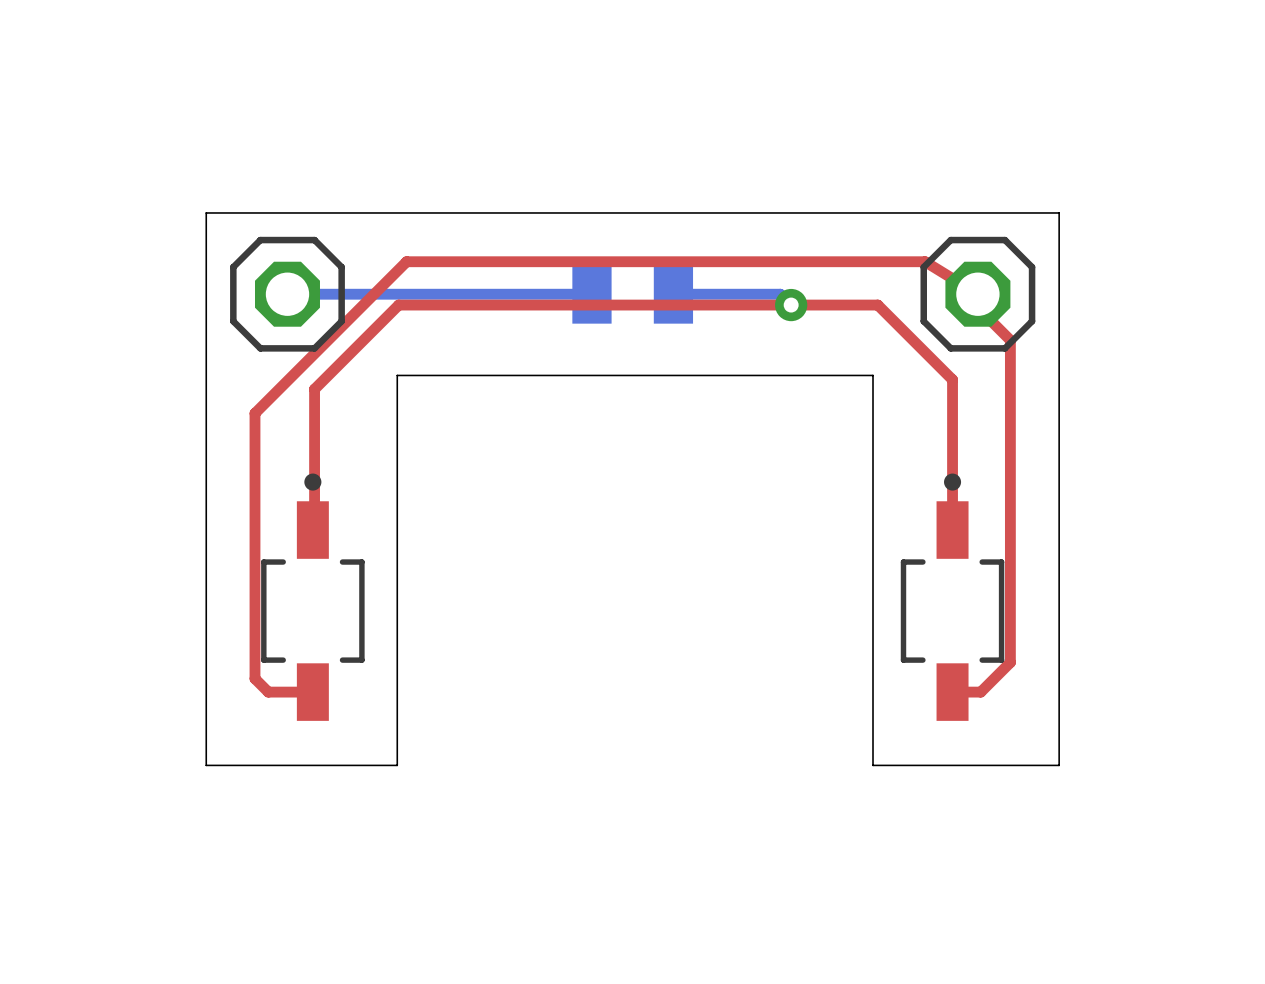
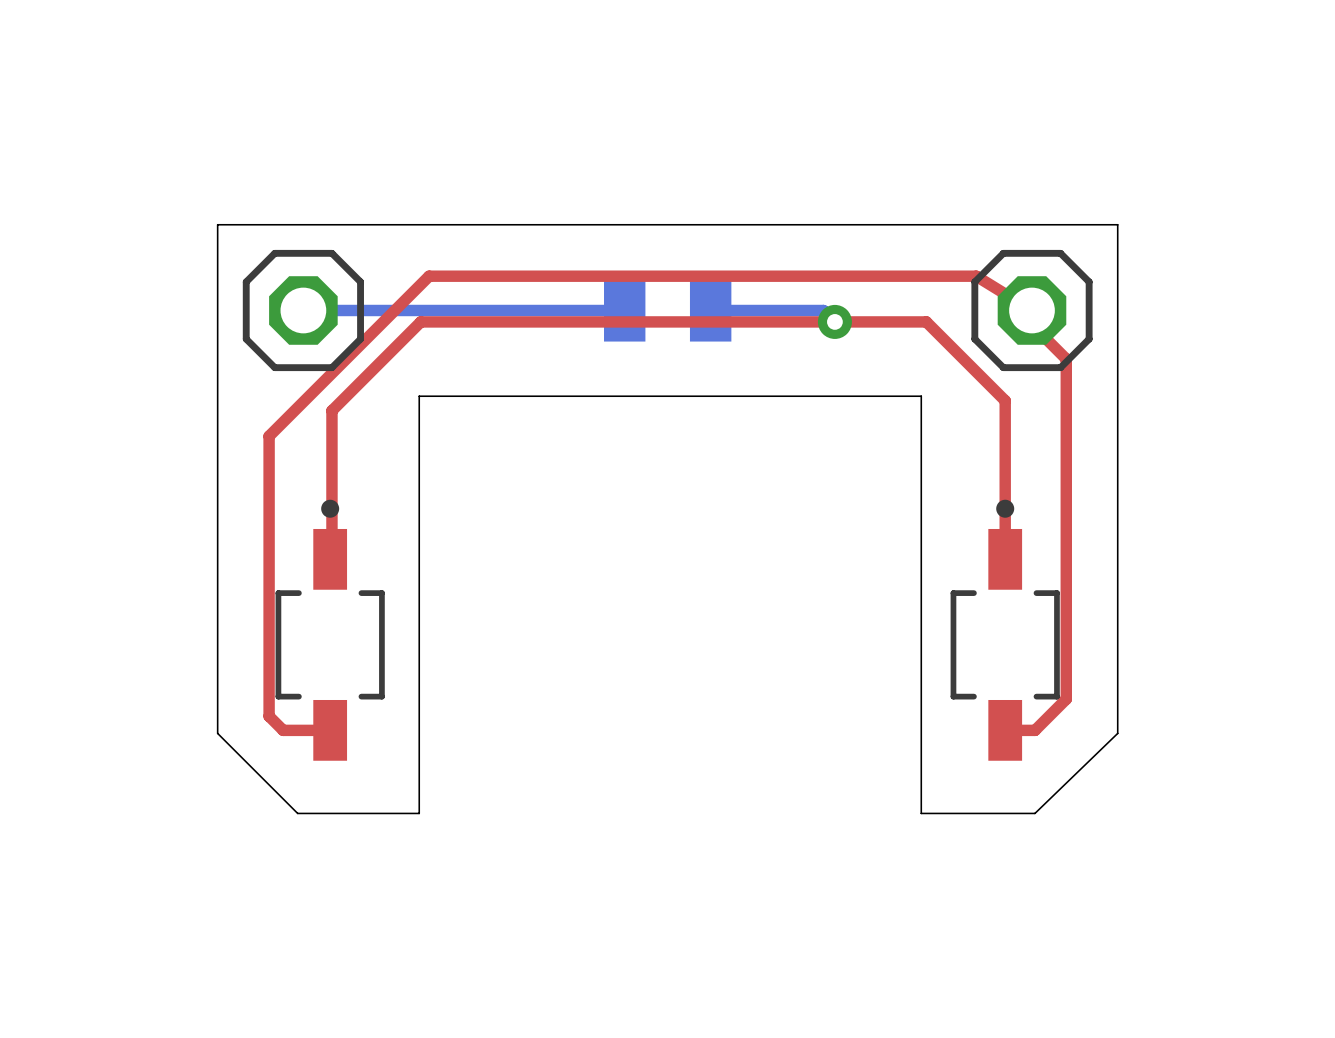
board edge: (206, 694) (206, 765) (397, 765) -> (217, 733) (297, 813) (419, 813) (419, 807)
board edge: (1059, 694) (1059, 765) (873, 765) -> (1117, 733) (1034, 813) (921, 813) (921, 807)

